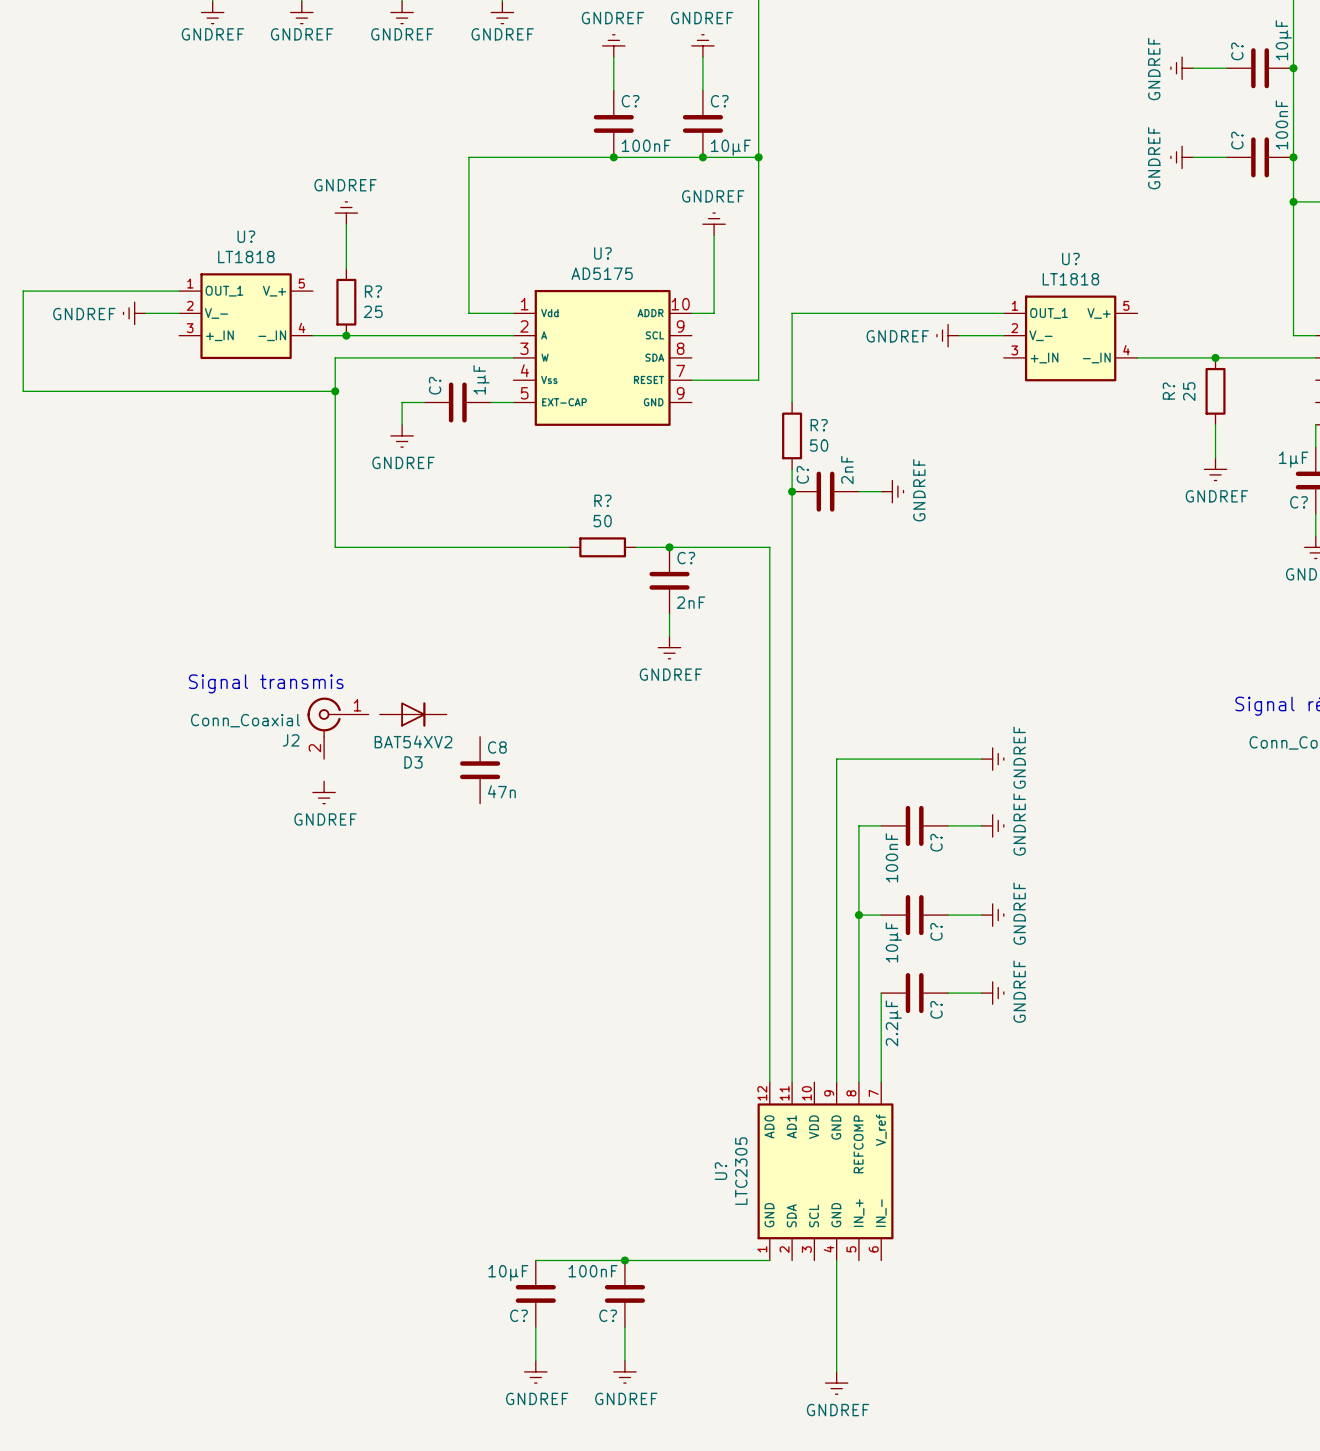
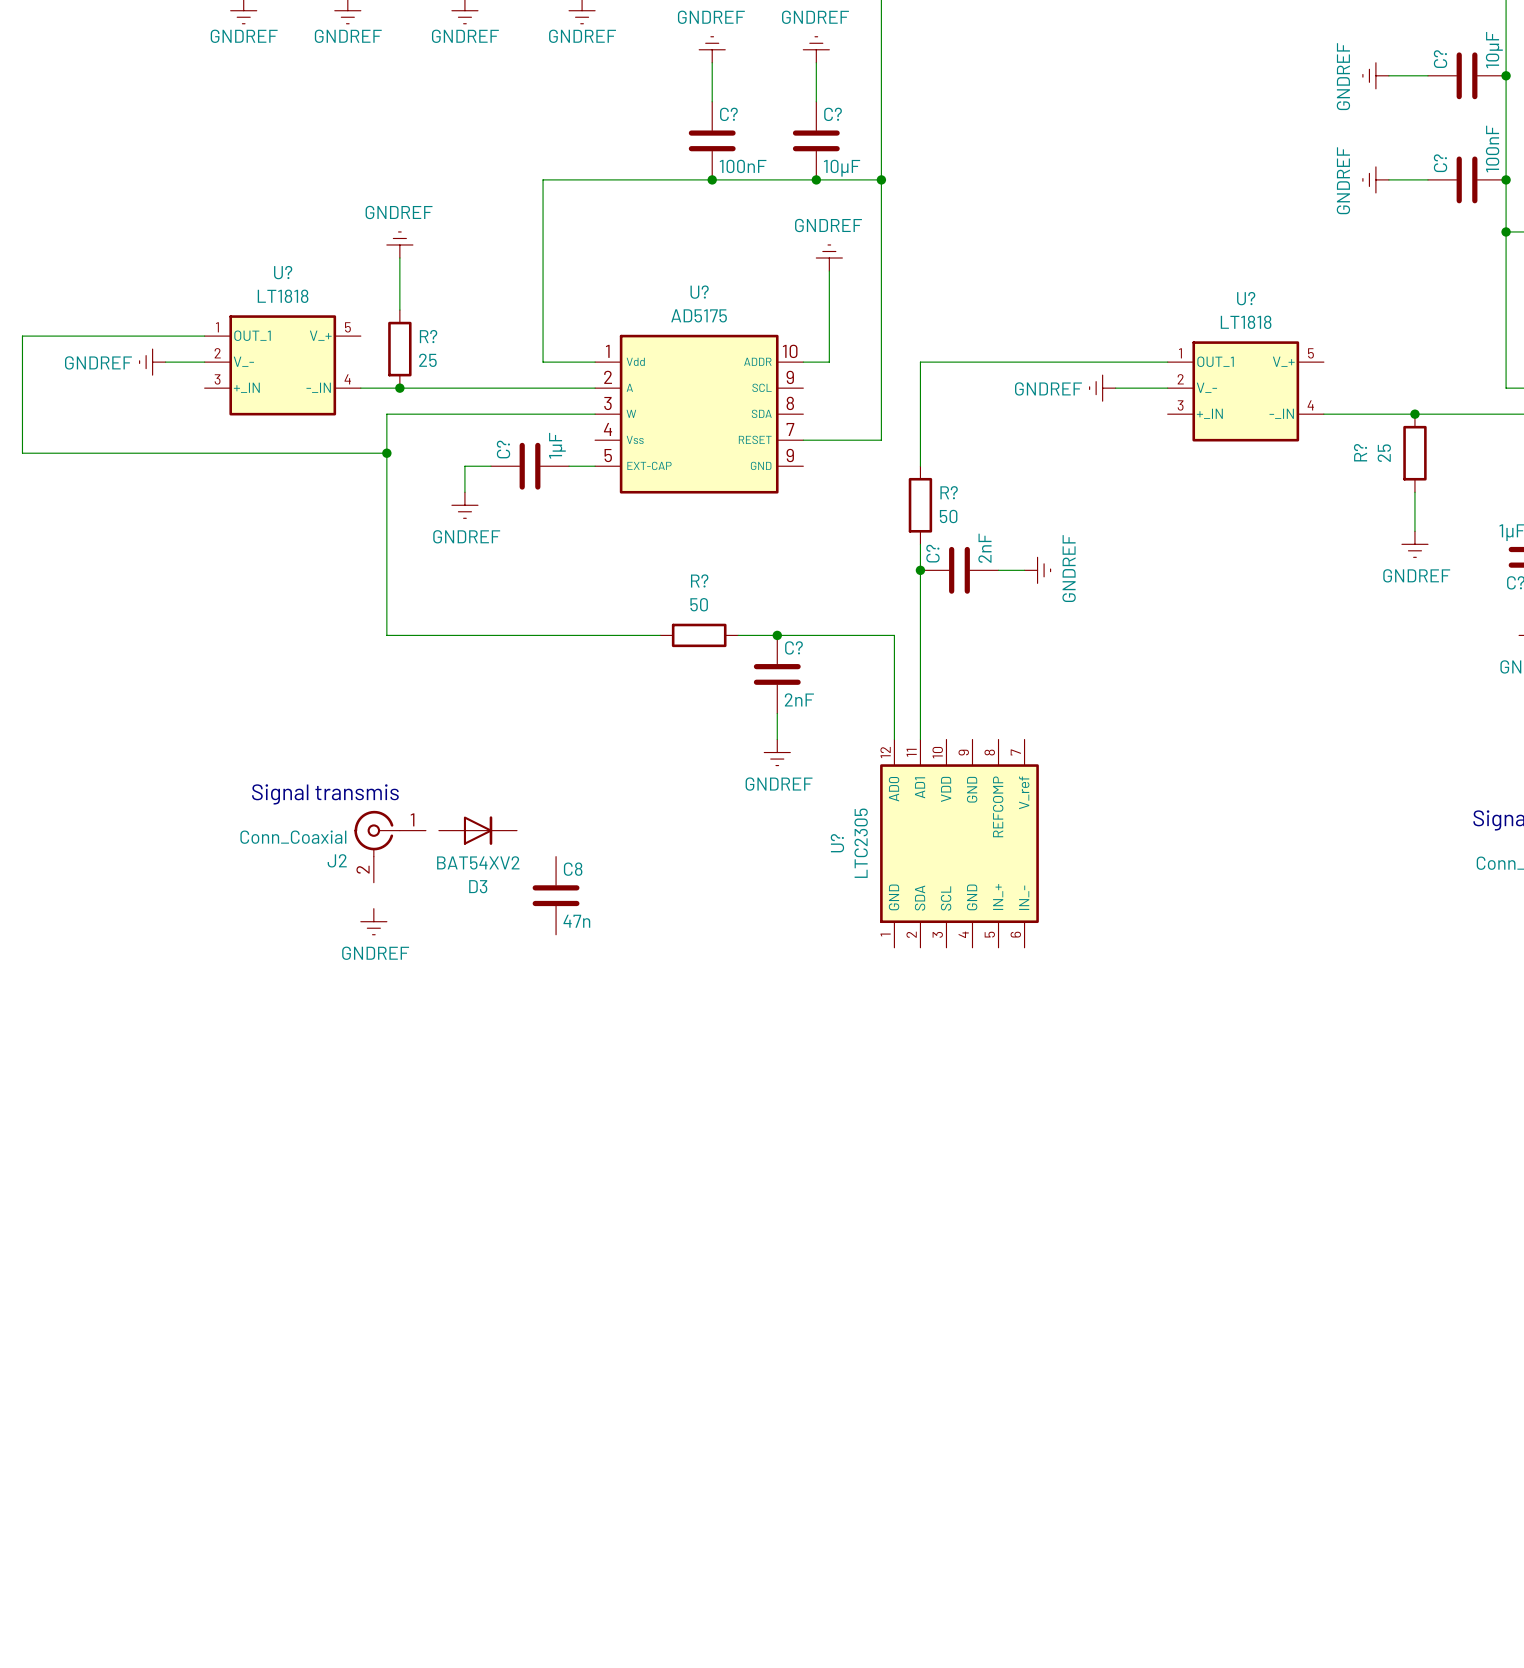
wire: (769, 636) (769, 1082) -> none
wire: (792, 636) (792, 1082) -> none
U?: none -> LTC2305 (959, 843)
wire: (981, 759) (836, 759) (836, 1082) -> none
power symbol: GNDREF (992, 759) -> none
wire: (881, 825) (858, 825) (858, 1082) -> none
C?: 100nF (914, 825) -> none
wire: (948, 825) (981, 825) -> none
power symbol: GNDREF (992, 825) -> none
wire: (858, 915) (881, 915) -> none
junction: (858, 915) -> none
C?: 10µF (914, 915) -> none
wire: (948, 915) (981, 915) -> none
power symbol: GNDREF (992, 915) -> none
wire: (881, 993) (881, 1082) -> none
C?: 2.2µF (914, 993) -> none
wire: (948, 993) (981, 993) -> none
power symbol: GNDREF (992, 993) -> none
U?: LTC2305 (825, 1171) -> none
wire: (535, 1260) (769, 1260) -> none
junction: (624, 1260) -> none
wire: (836, 1260) (836, 1371) -> none
C?: 10µF (535, 1293) -> none
C?: 100nF (624, 1293) -> none
wire: (535, 1327) (535, 1360) -> none
wire: (624, 1327) (624, 1360) -> none
power symbol: GNDREF (535, 1371) -> none
power symbol: GNDREF (624, 1371) -> none
power symbol: GNDREF (836, 1383) -> none

